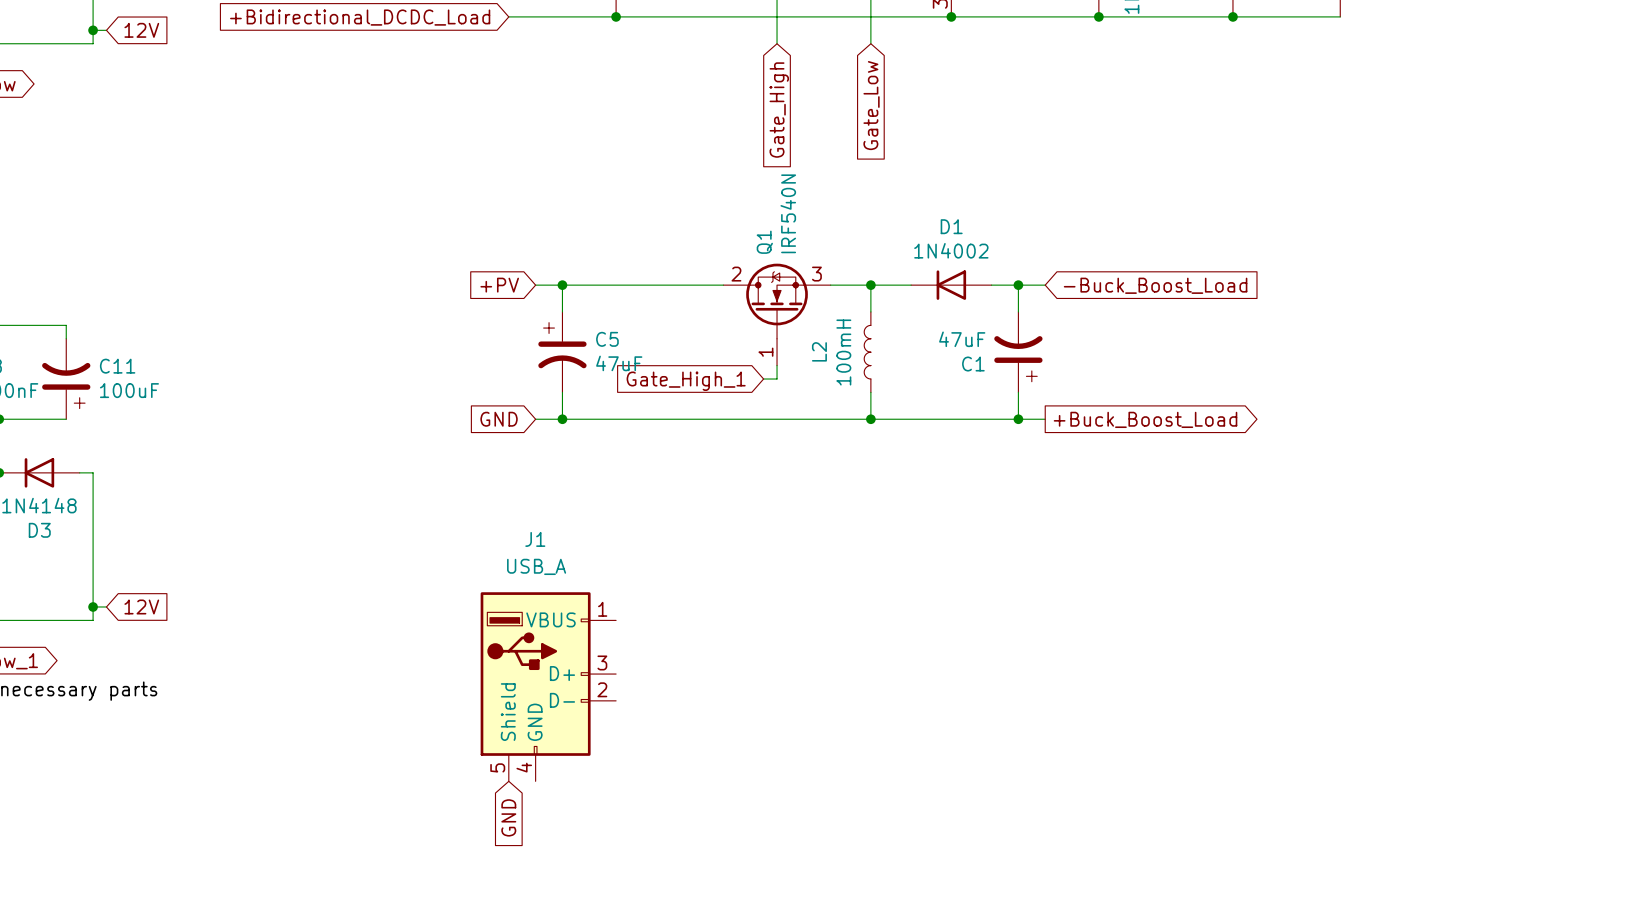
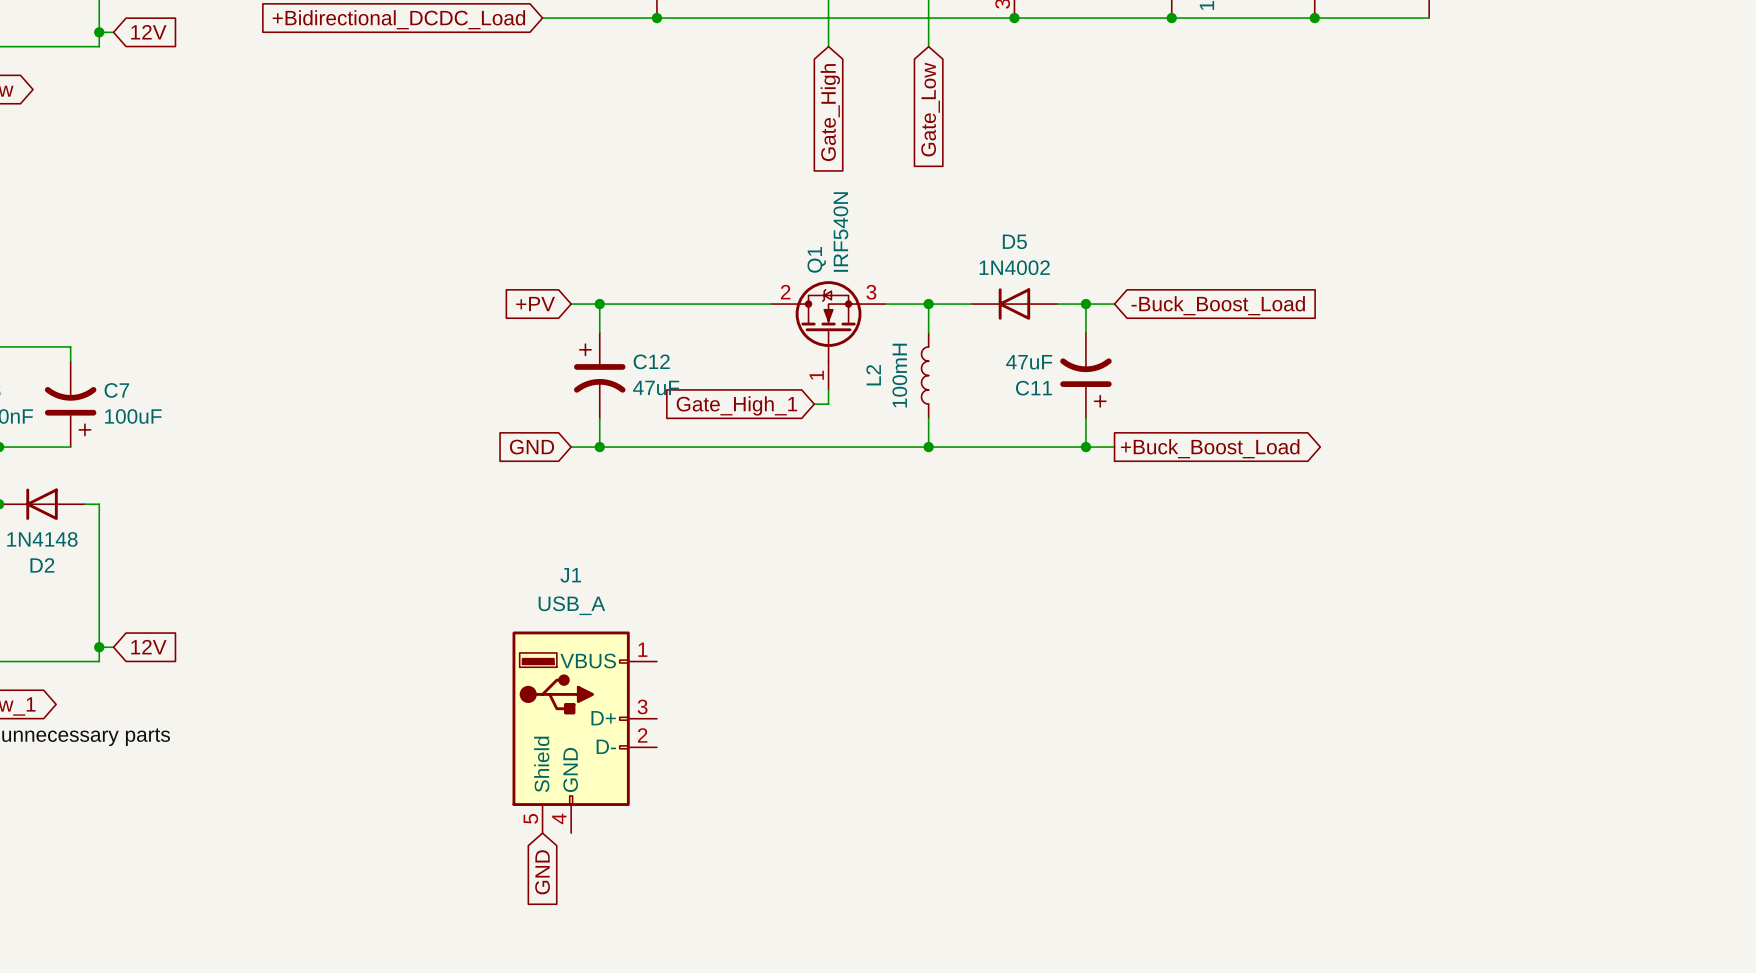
D1 name: D1 (951, 226) -> D5 (1014, 241)
C5 name: C5 (607, 339) -> C12 (651, 361)
C1 name: C1 (973, 364) -> C11 (1034, 388)
C11 name: C11 (117, 366) -> C7 (116, 390)
D3 name: D3 (39, 530) -> D2 (42, 565)

